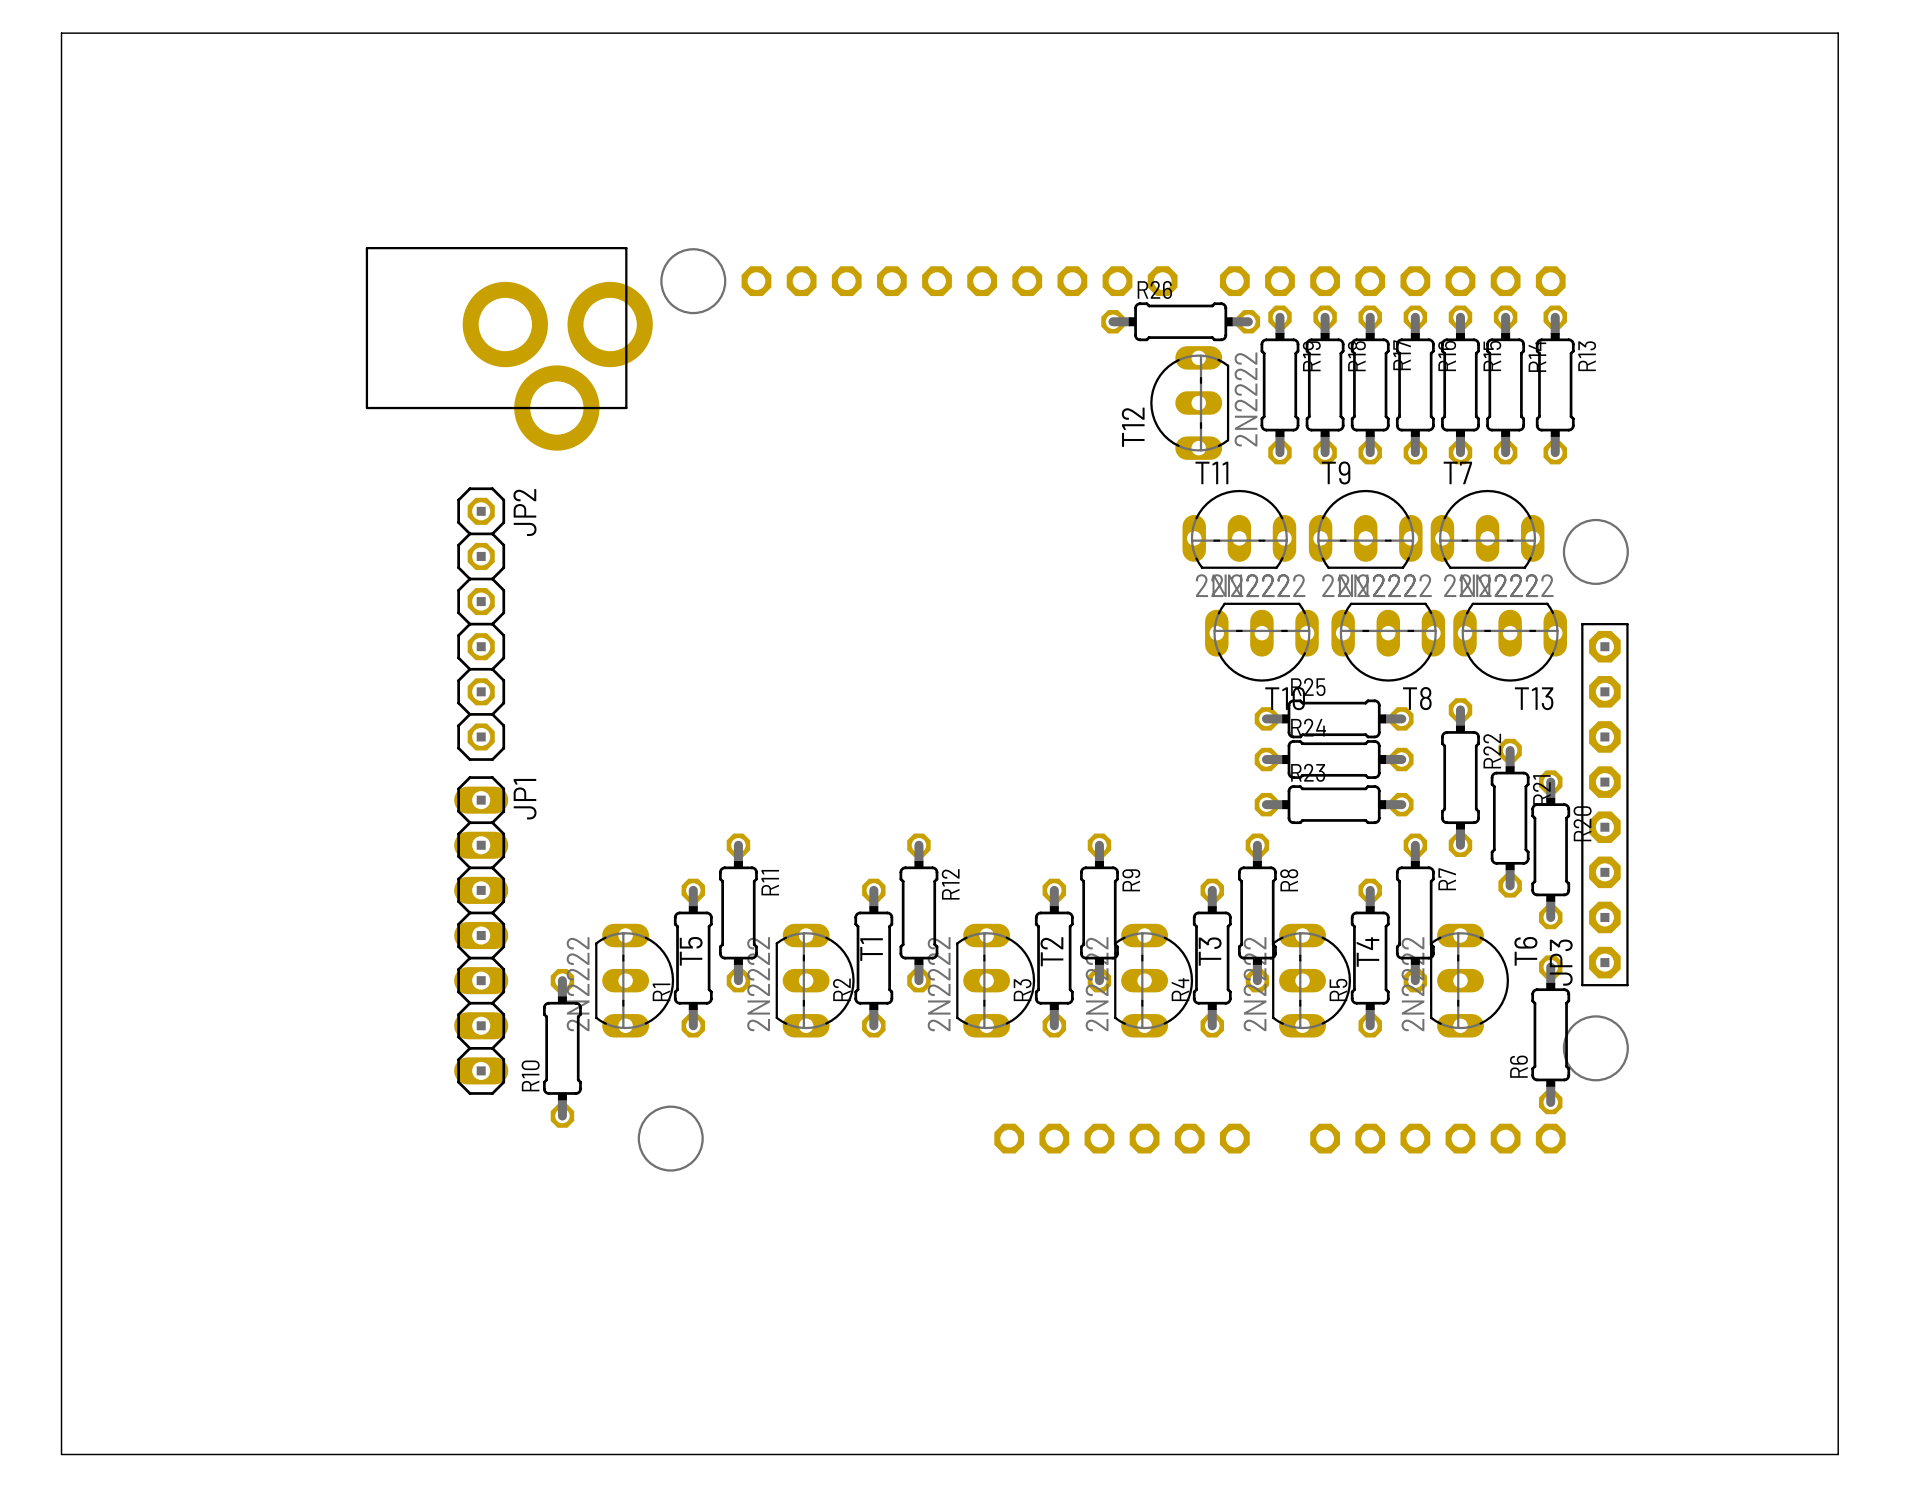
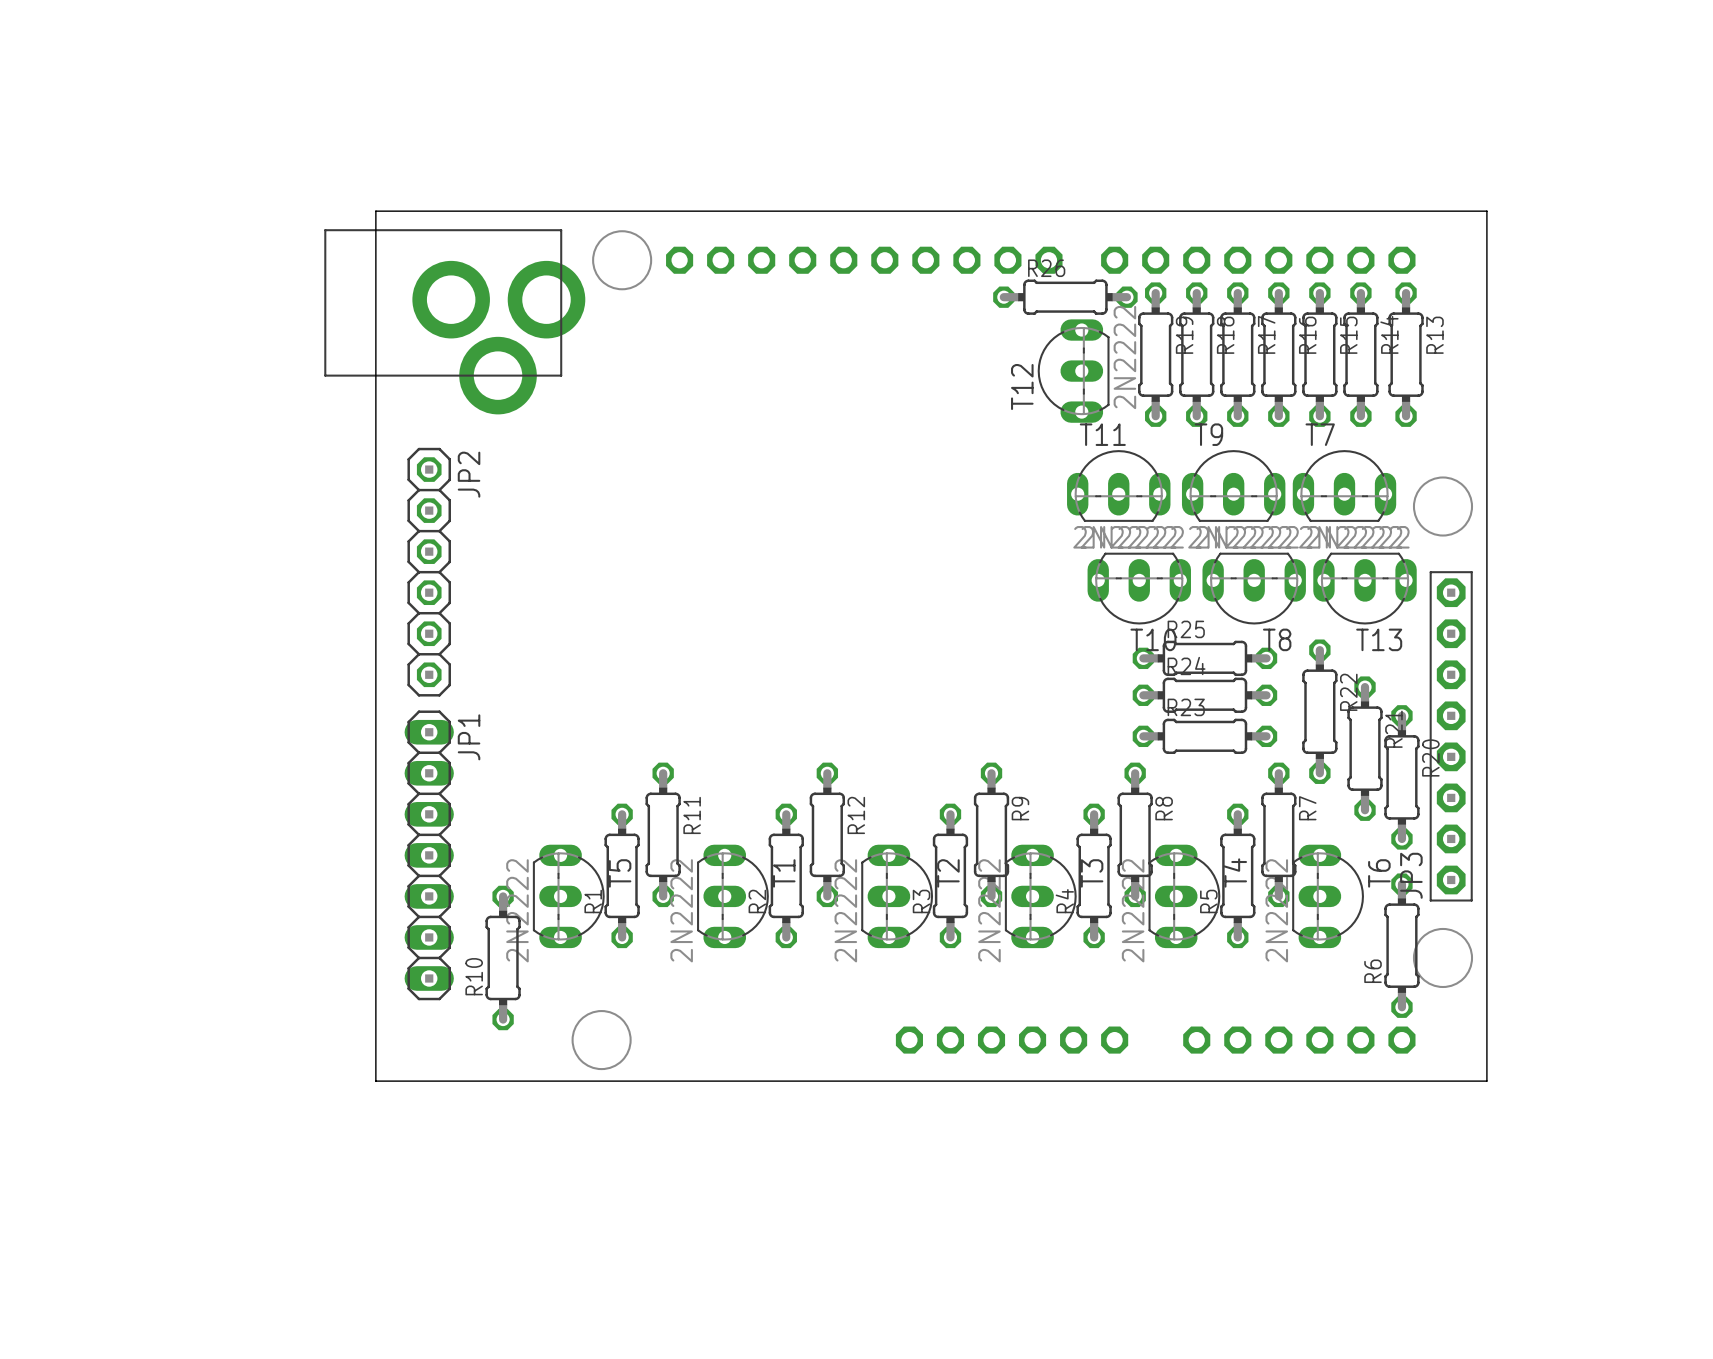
board edge: (61, 33) (1838, 33) (1838, 1454) (61, 1454) (61, 33) -> none
board edge: none -> (375, 211) (1486, 211) (1486, 1081) (375, 1081) (375, 211)

